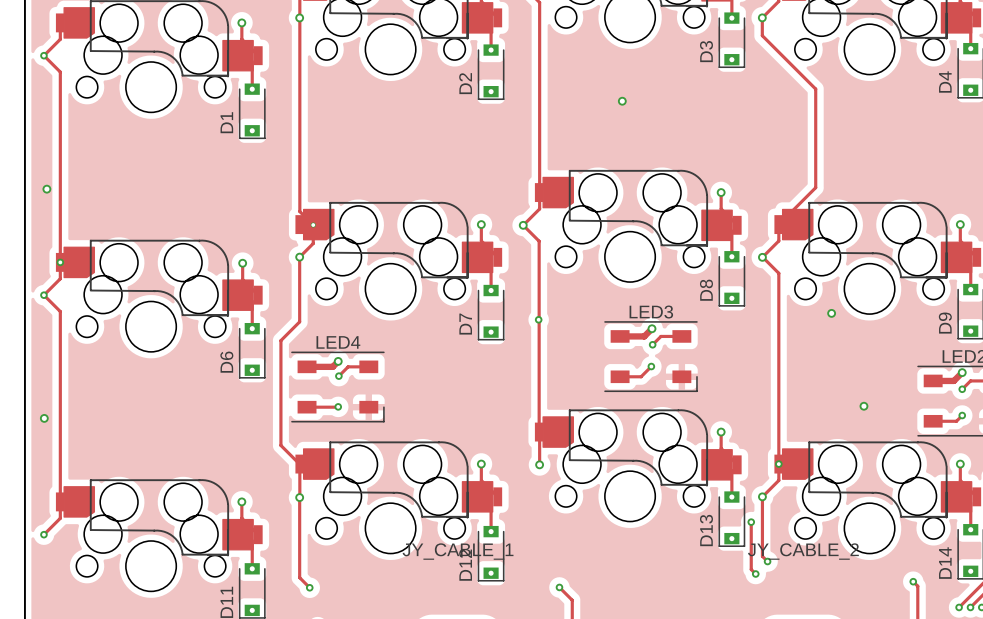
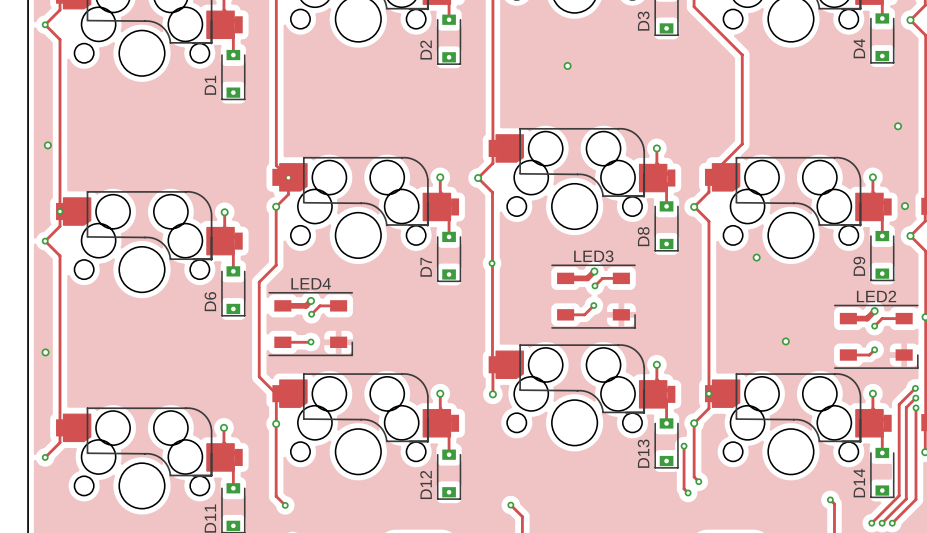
JY_CABLE_1 name: JY_CABLE_1 (458, 551) -> none
JY_CABLE_2 name: JY_CABLE_2 (803, 551) -> none

